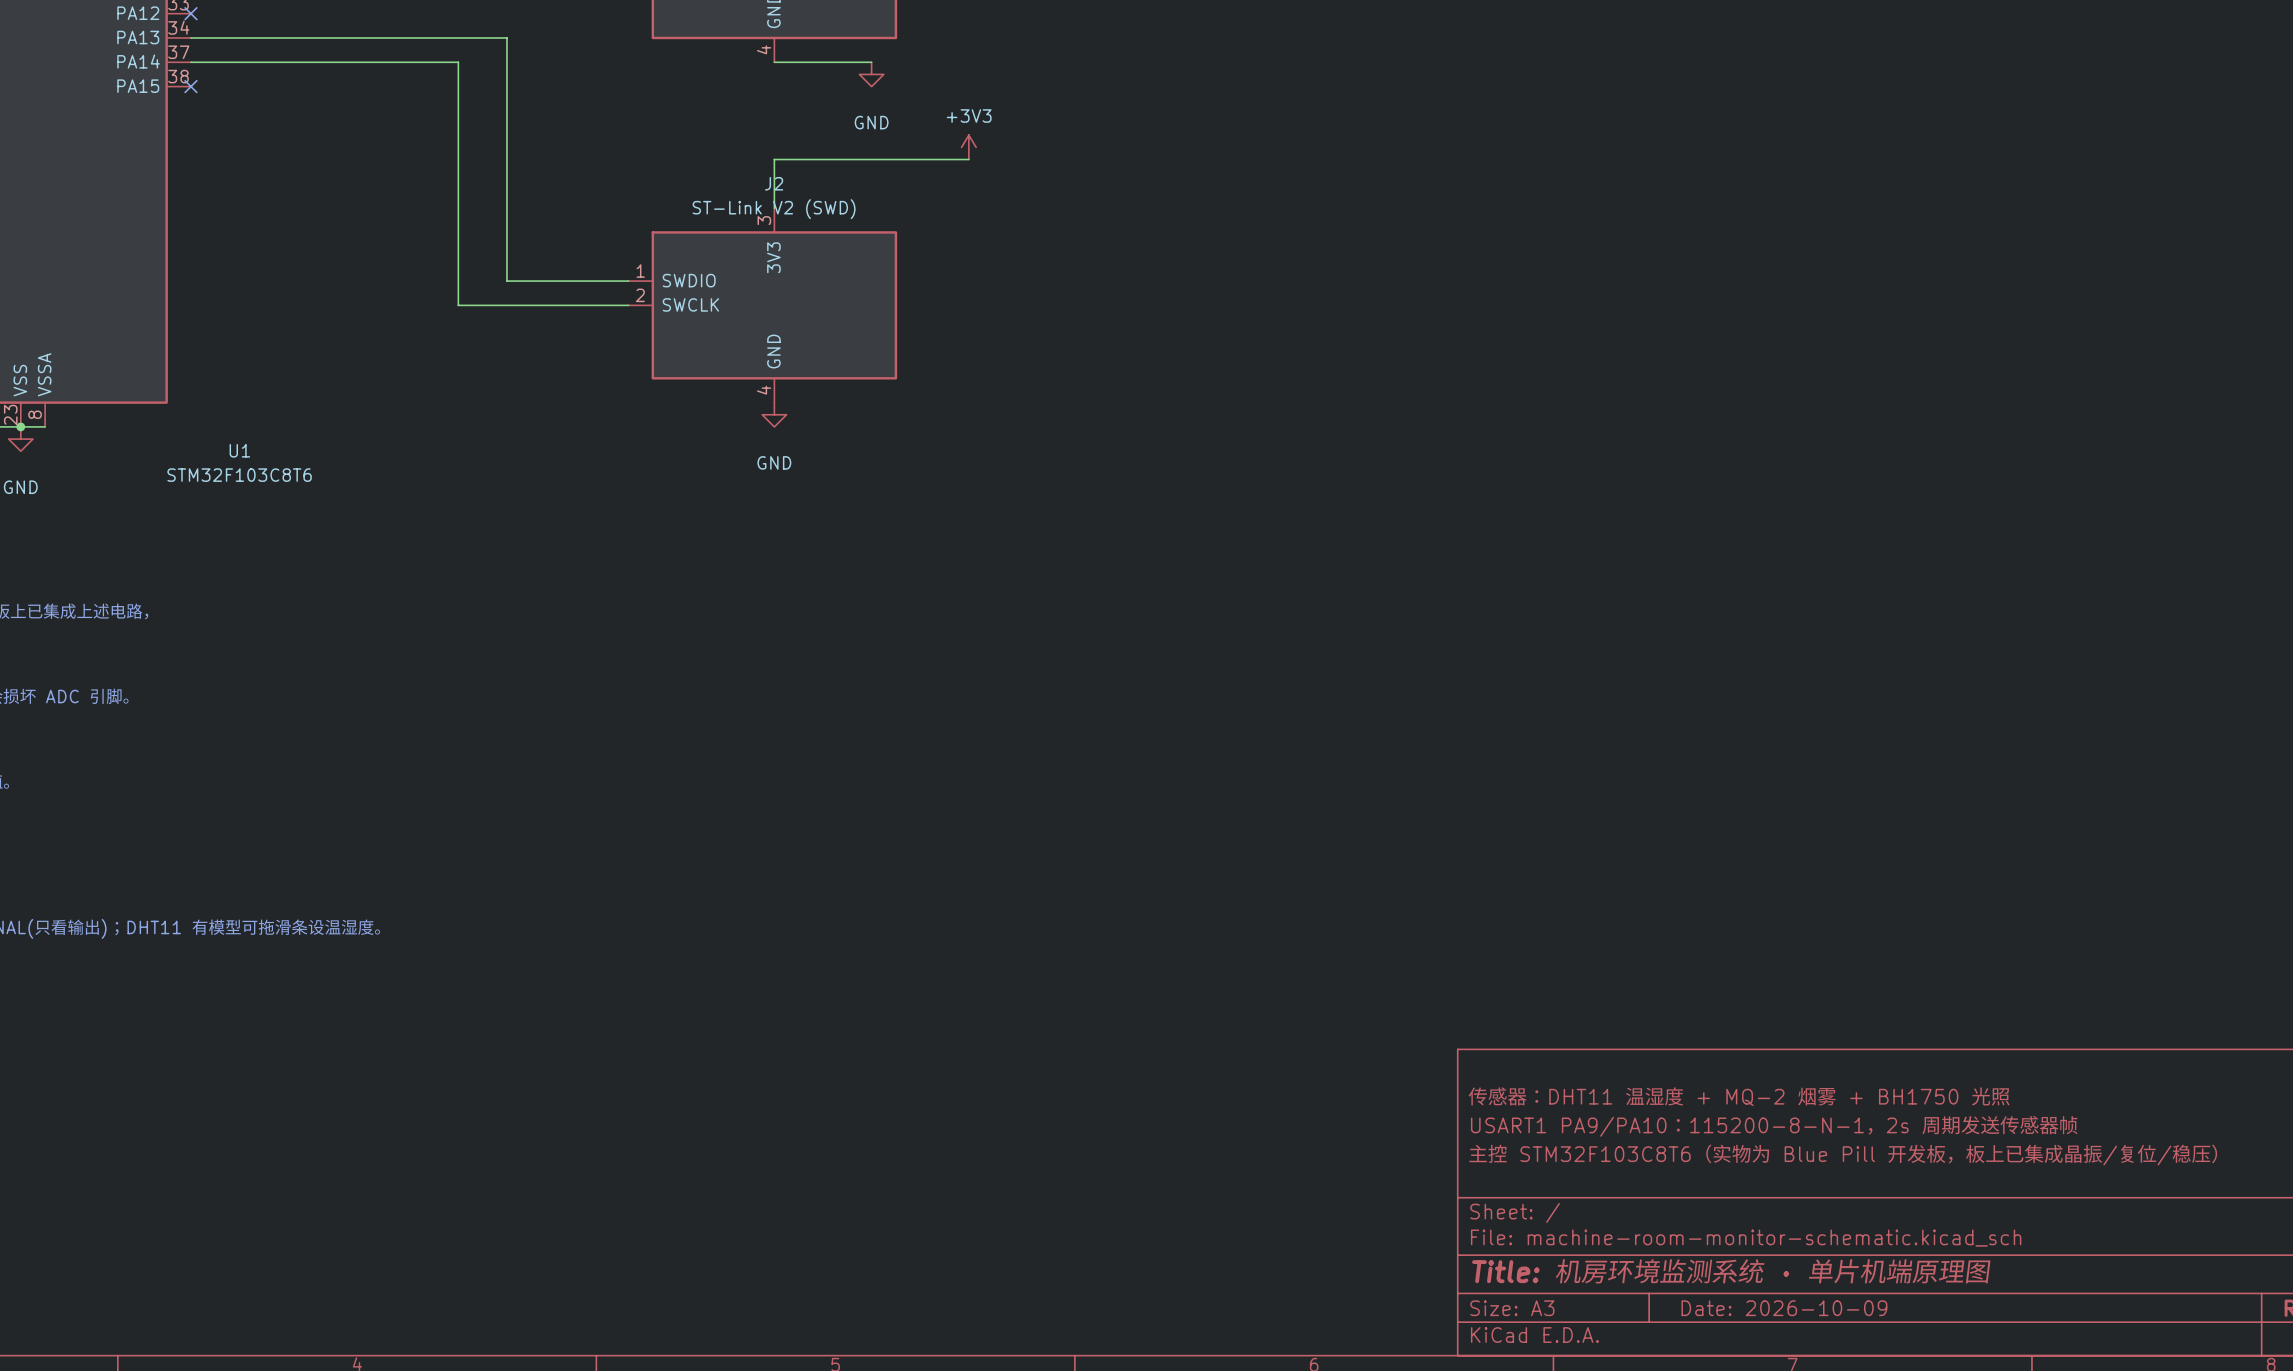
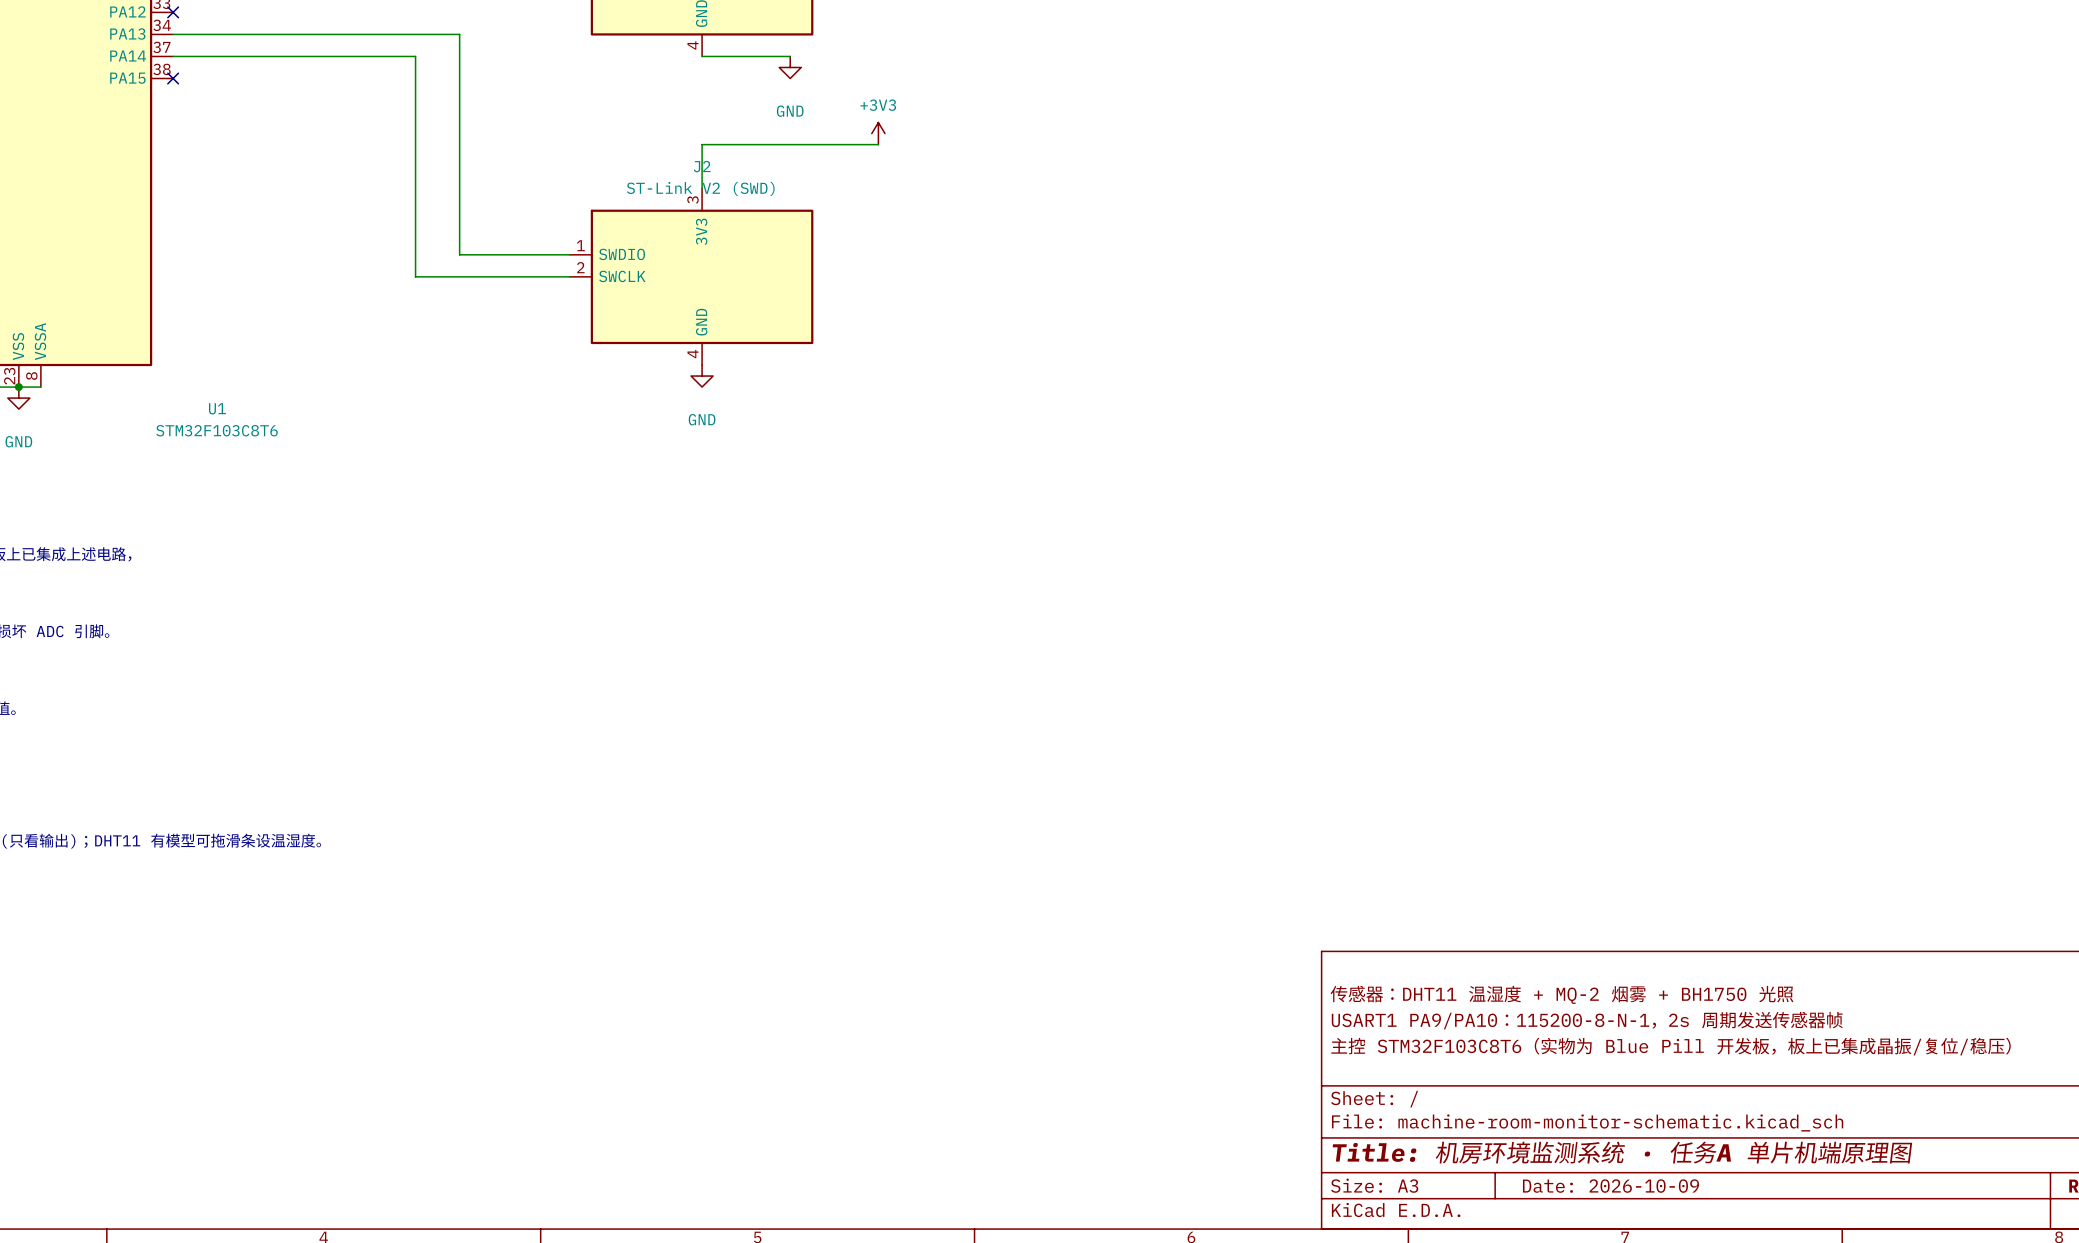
title block: Title: 机房环境监测系统 · 单片机端原理图 (1732, 1271) -> Title: 机房环境监测系统 · 任务A 单片机端原理图 (1622, 1152)

